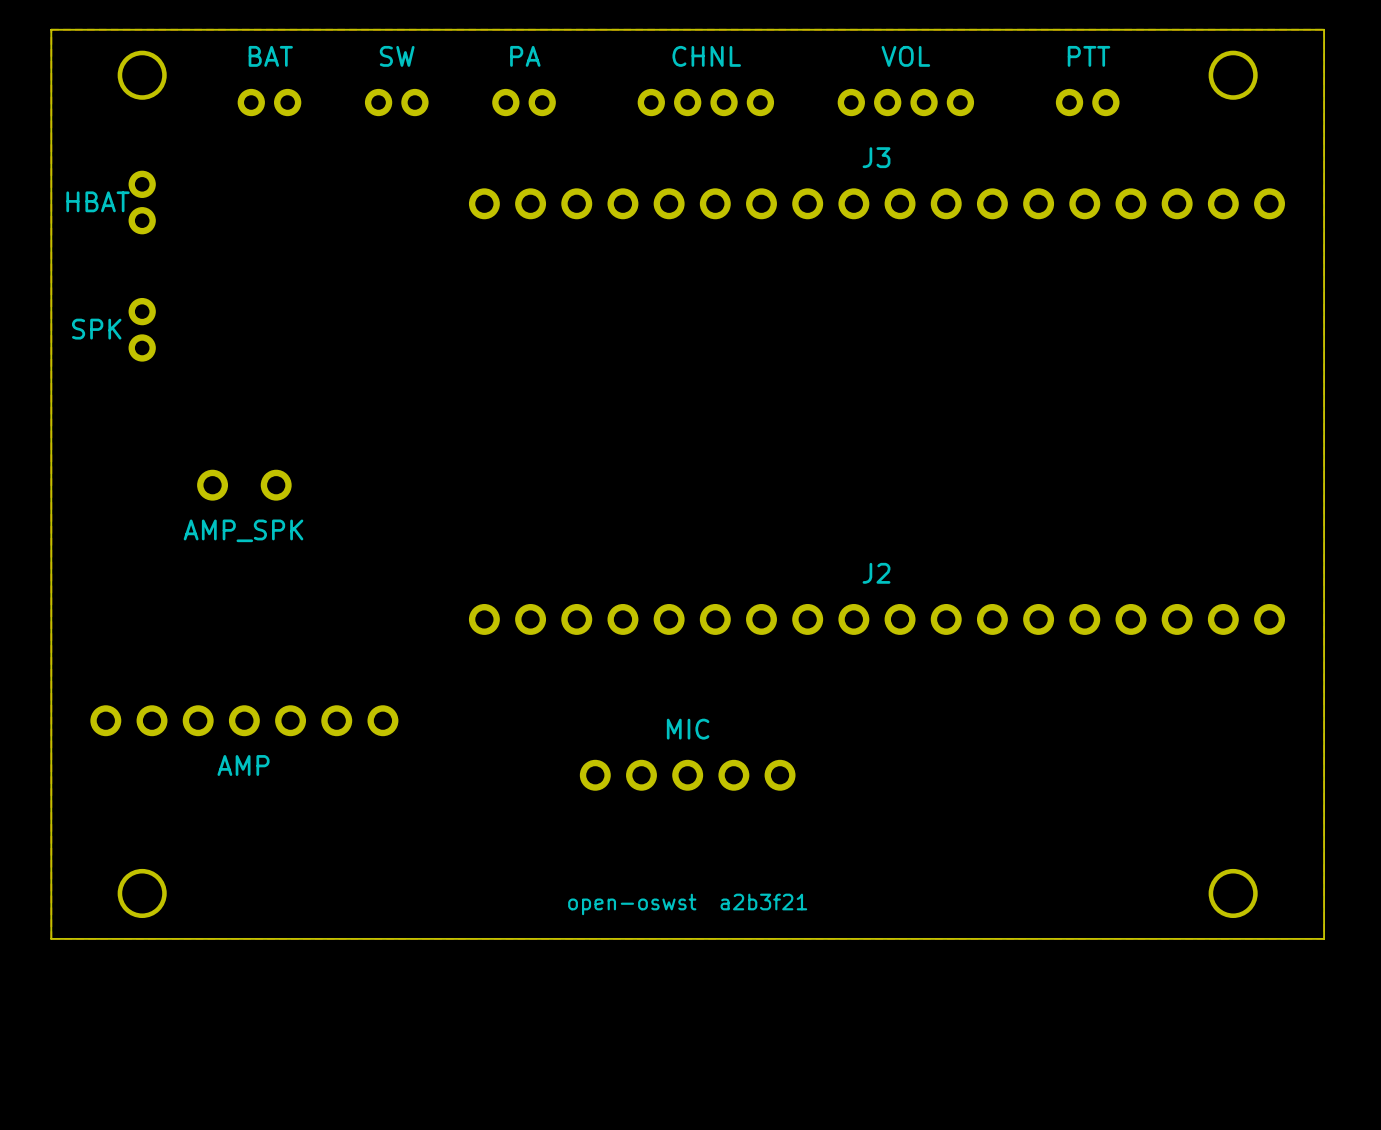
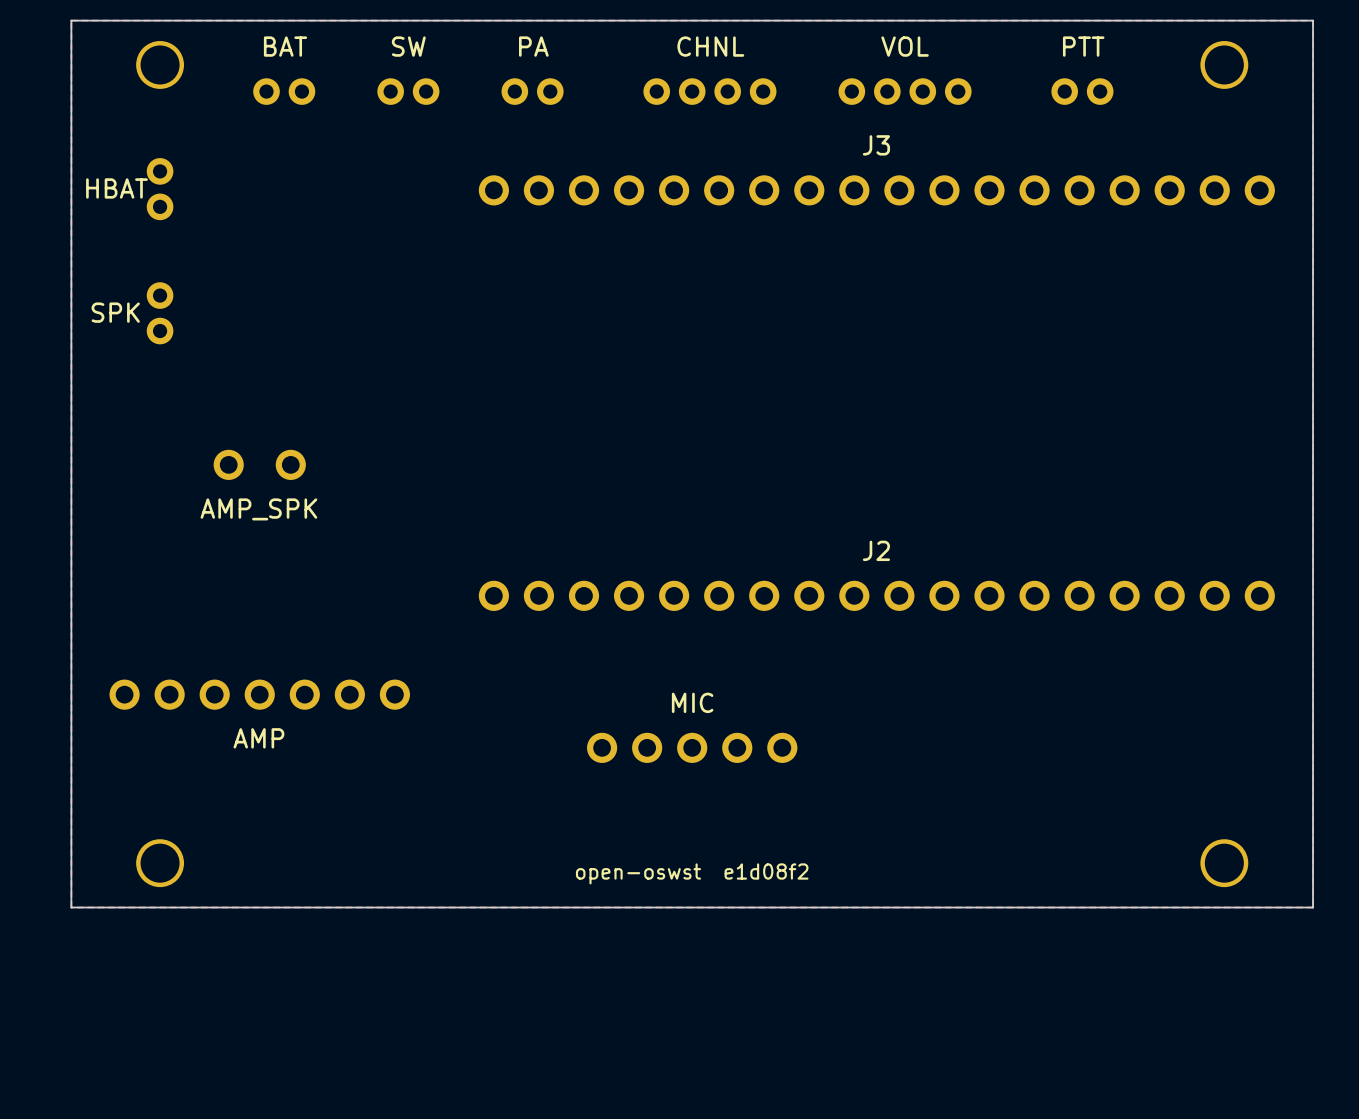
text: open-oswst a2b3f21 (687, 904) -> open-oswst e1d08f2 (692, 873)

